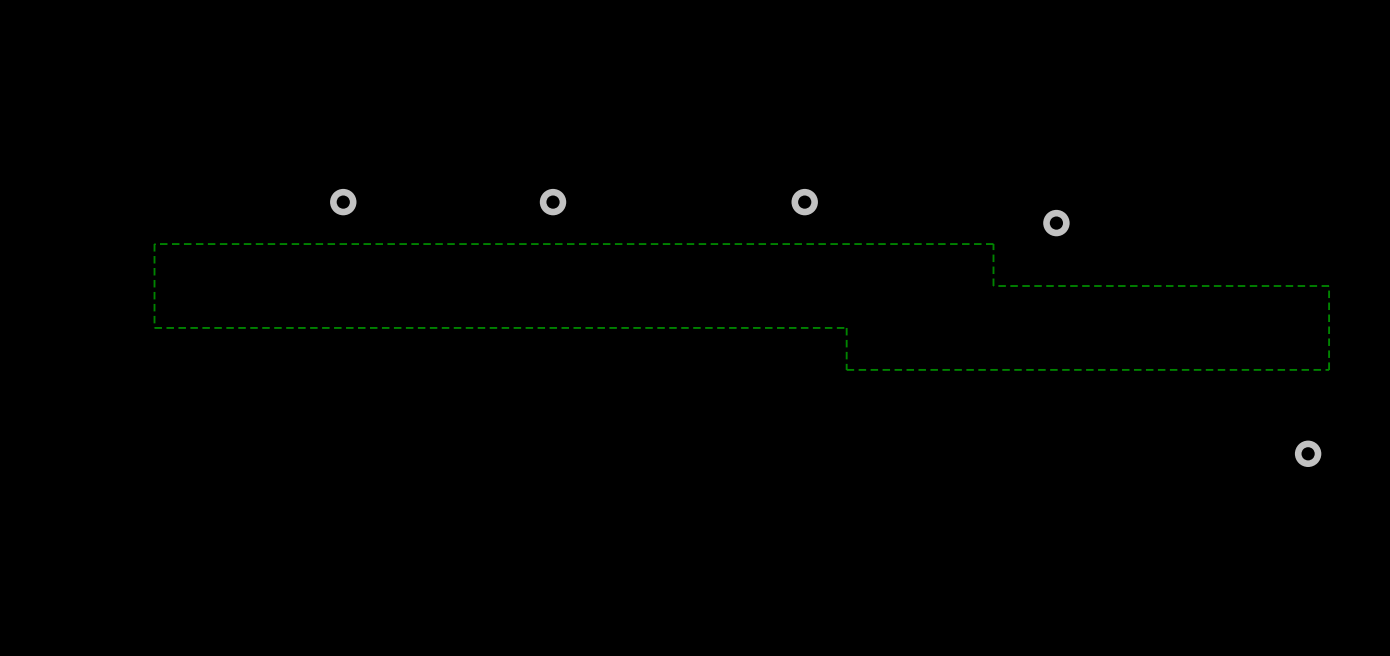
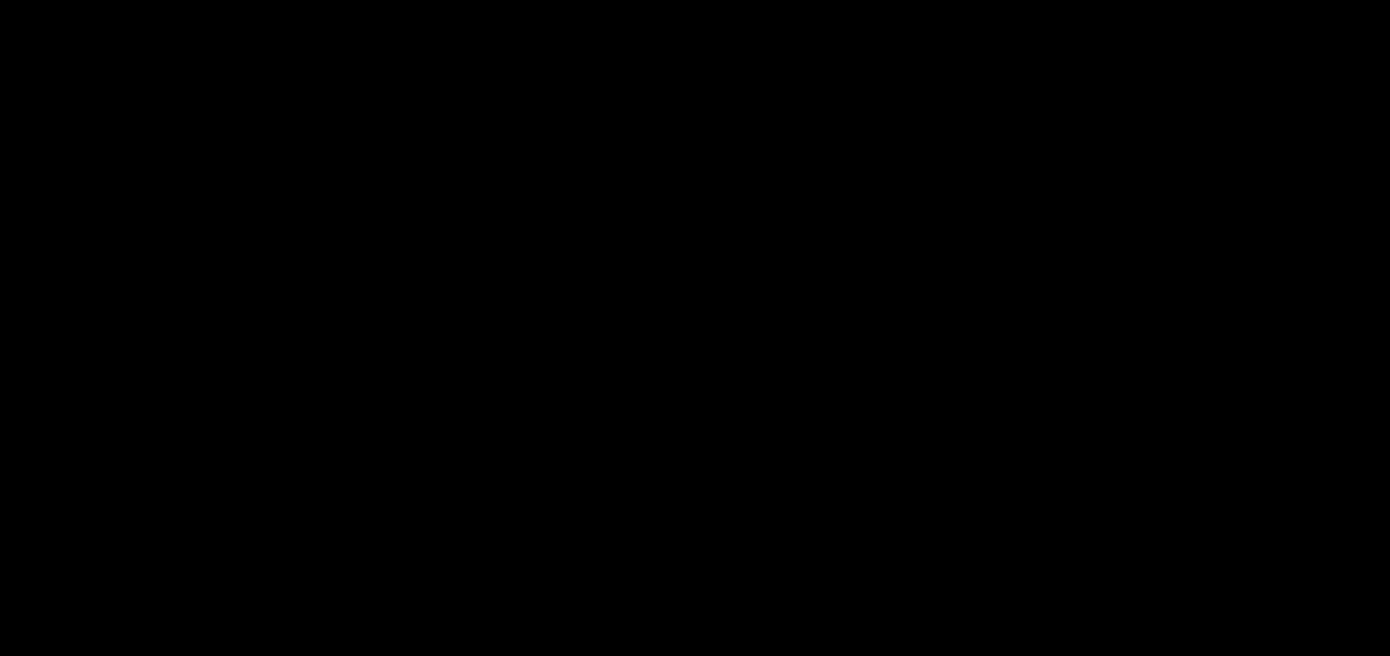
via: (343, 202) -> none
via: (553, 202) -> none
via: (804, 202) -> none
via: (1056, 223) -> none
zone outline: (993, 244) (993, 286) (1329, 286) (1329, 369) (846, 369) (846, 327) (154, 327) (154, 244) (993, 244) -> none
via: (1308, 453) -> none

